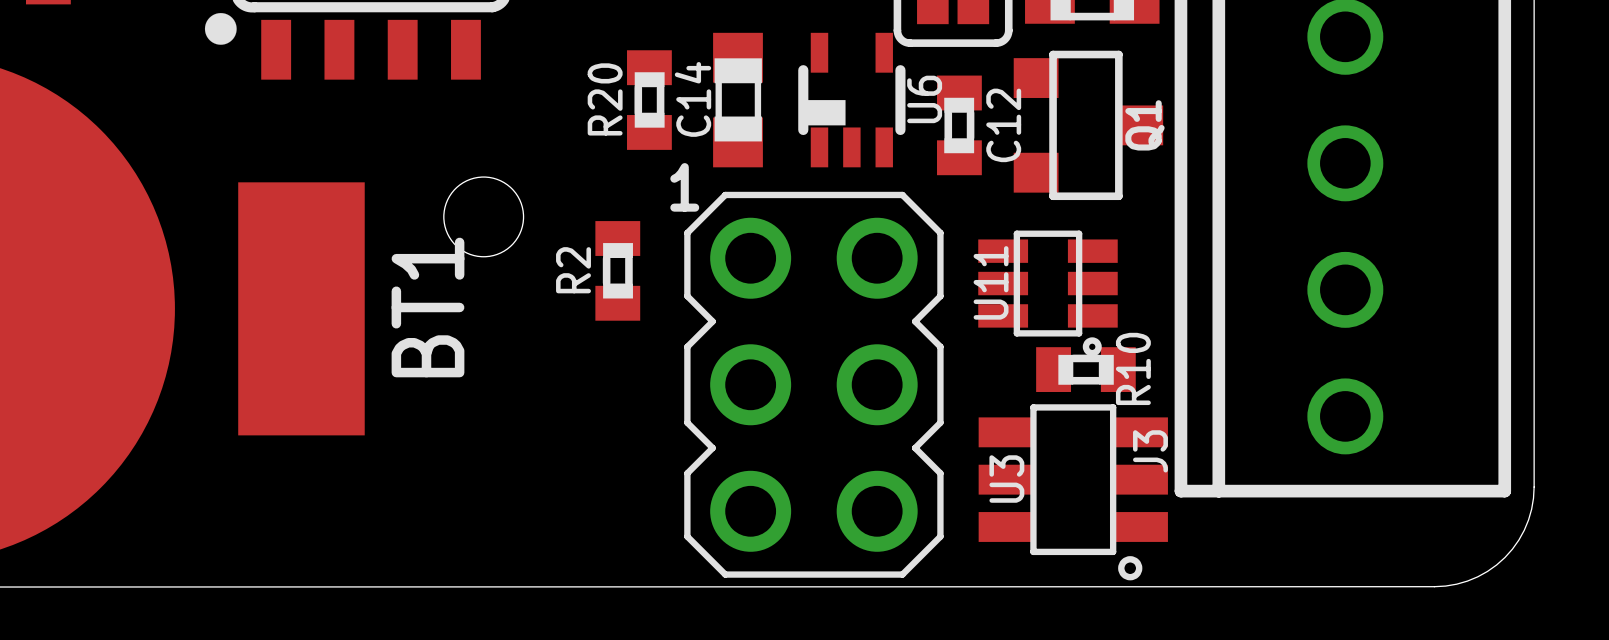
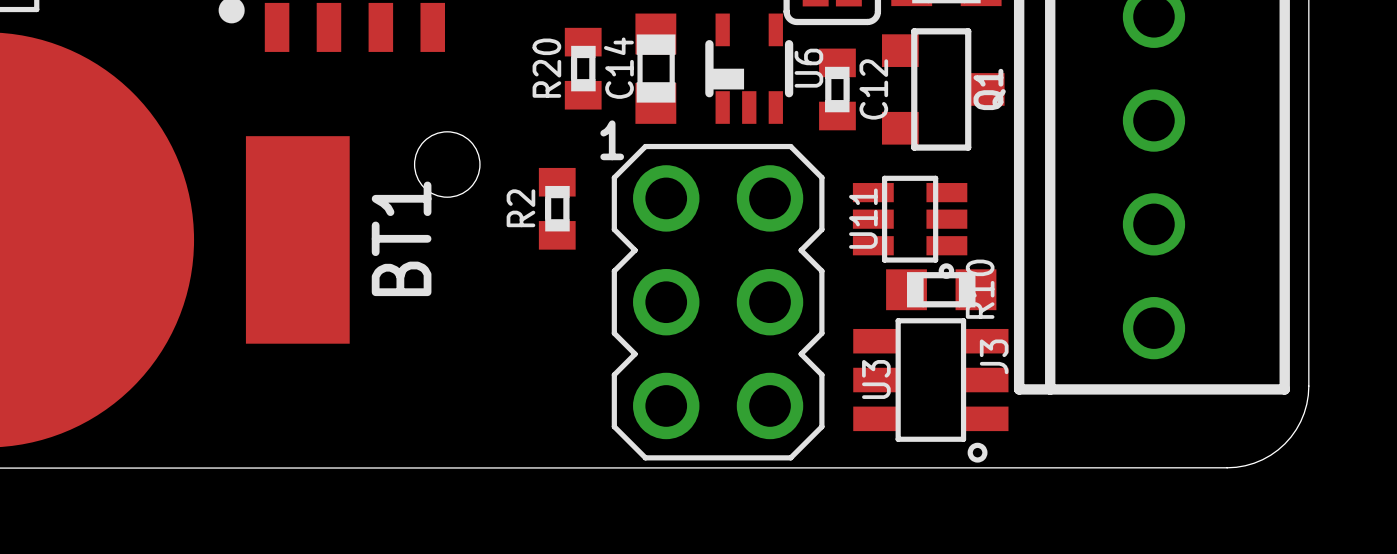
R10 footprint: [1036, 347, 1136, 393] -> [886, 269, 997, 311]

